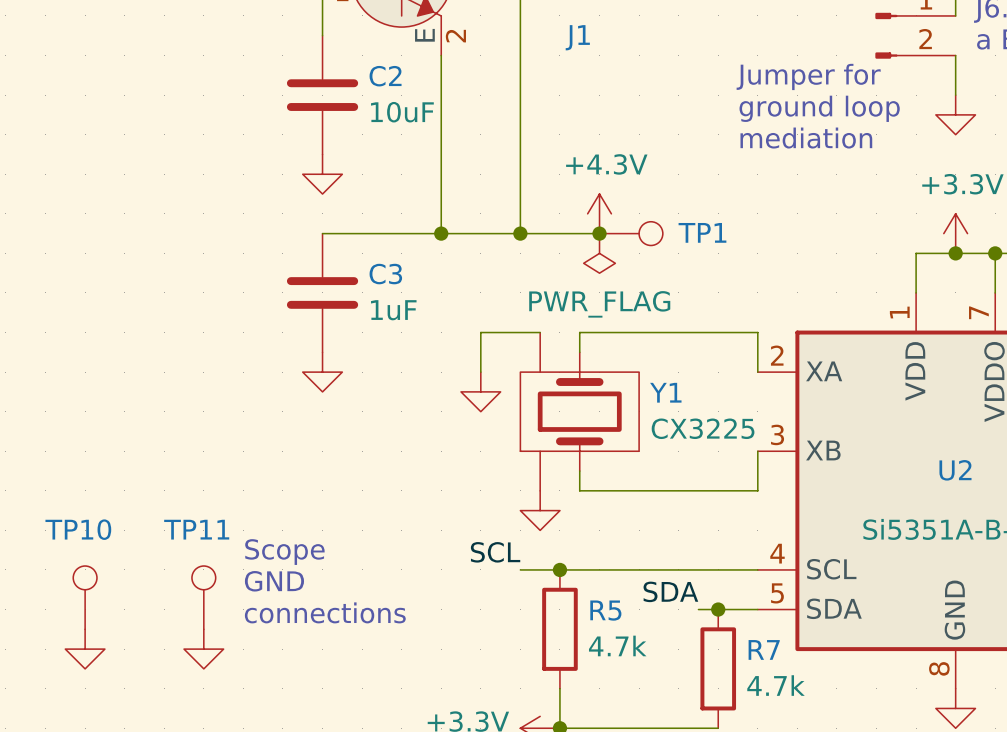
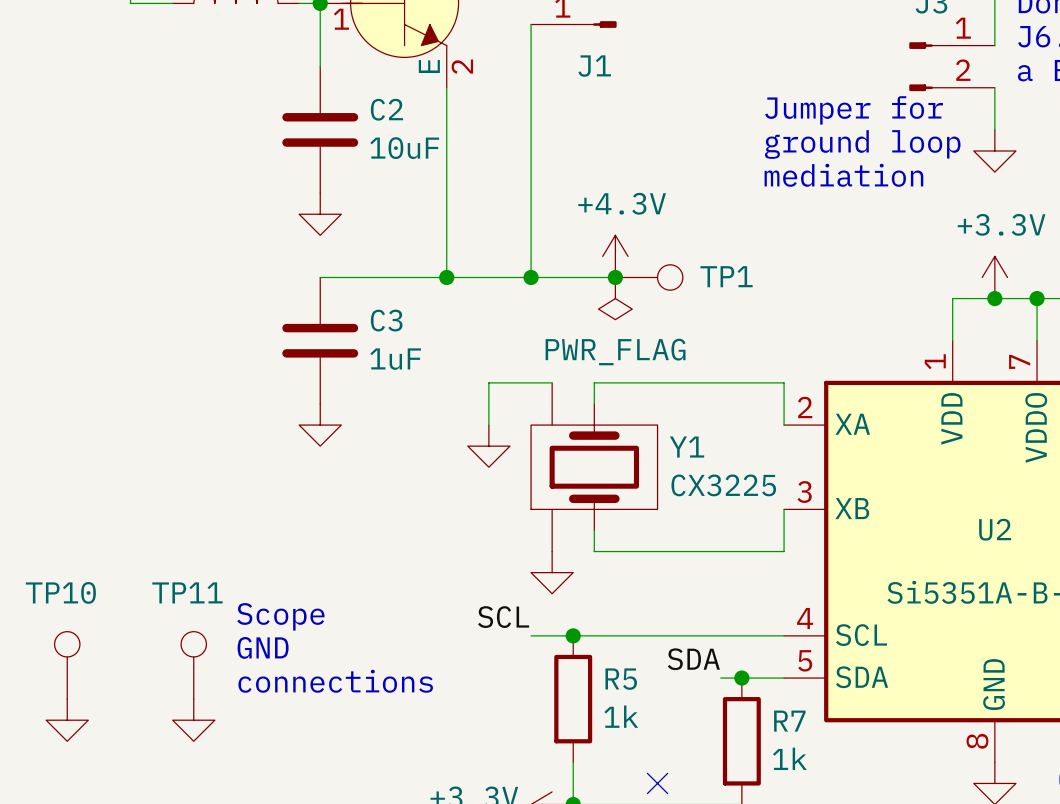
R5 value: 4.7k (617, 645) -> 1k (621, 716)
R7 value: 4.7k (776, 685) -> 1k (789, 758)
no-connect mark: none -> (657, 783)

